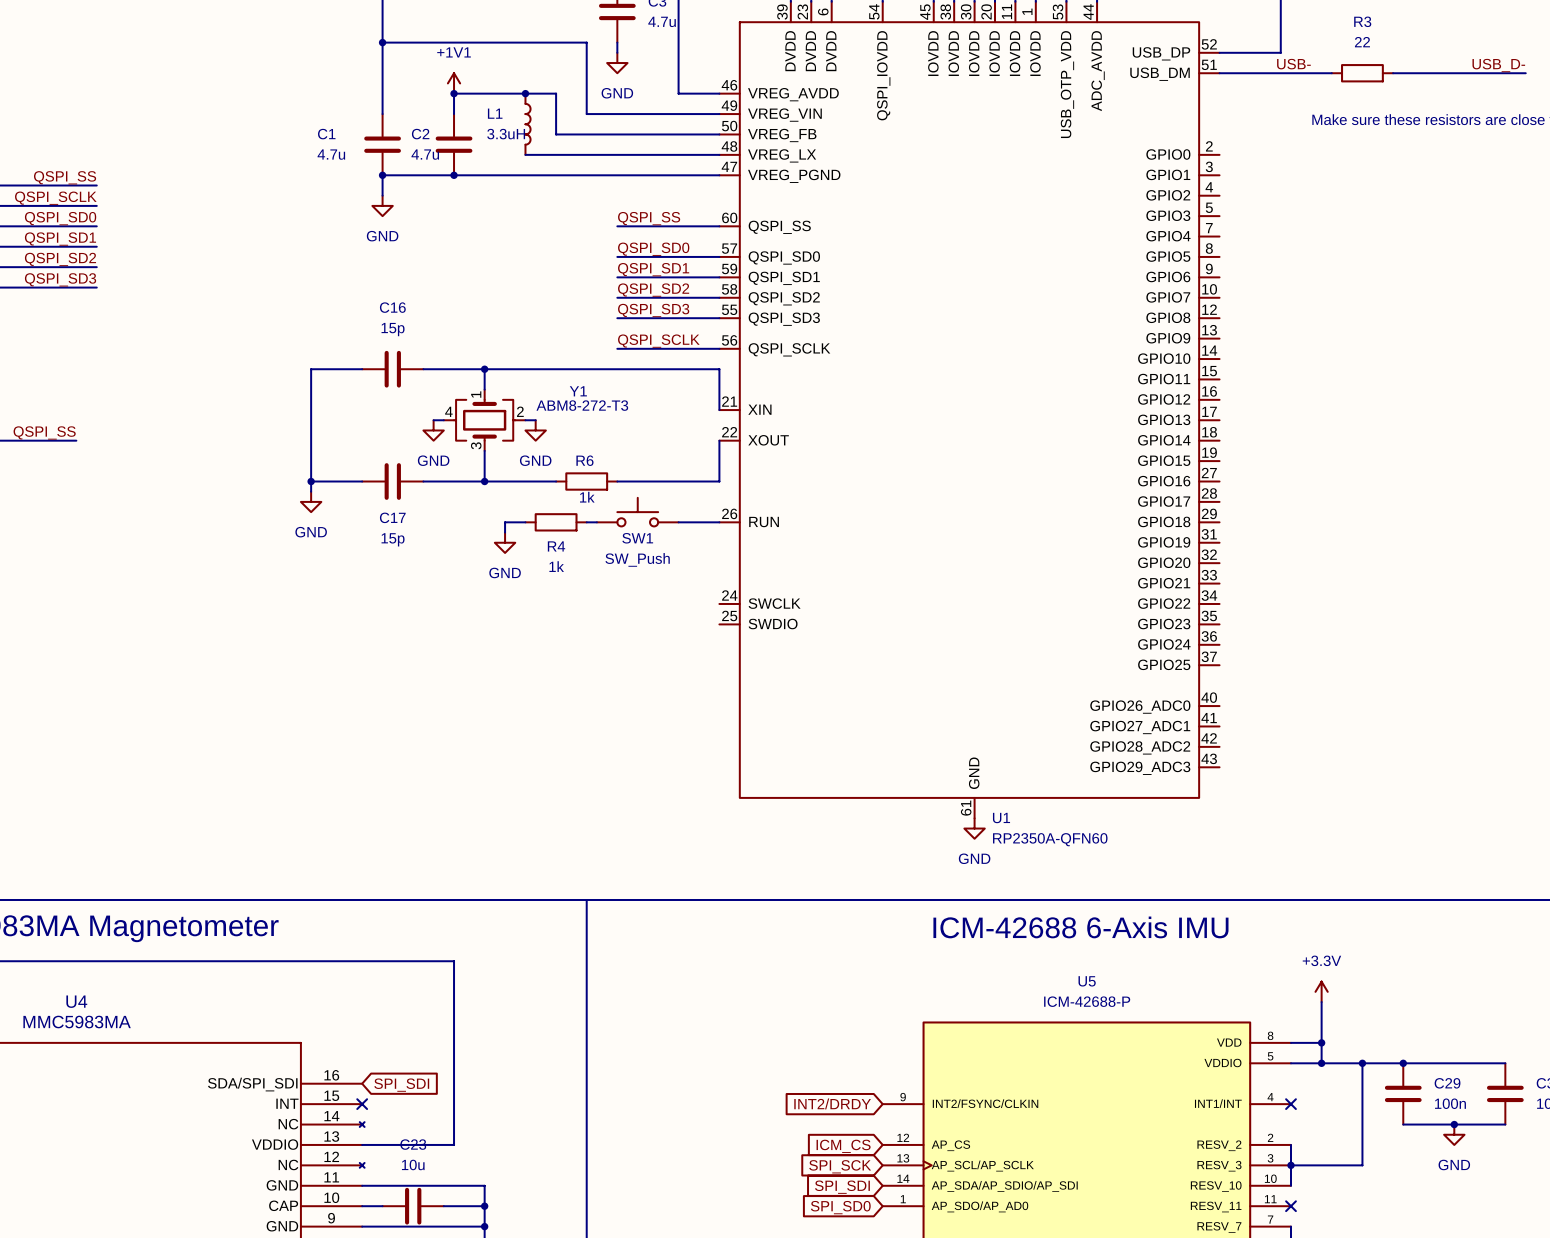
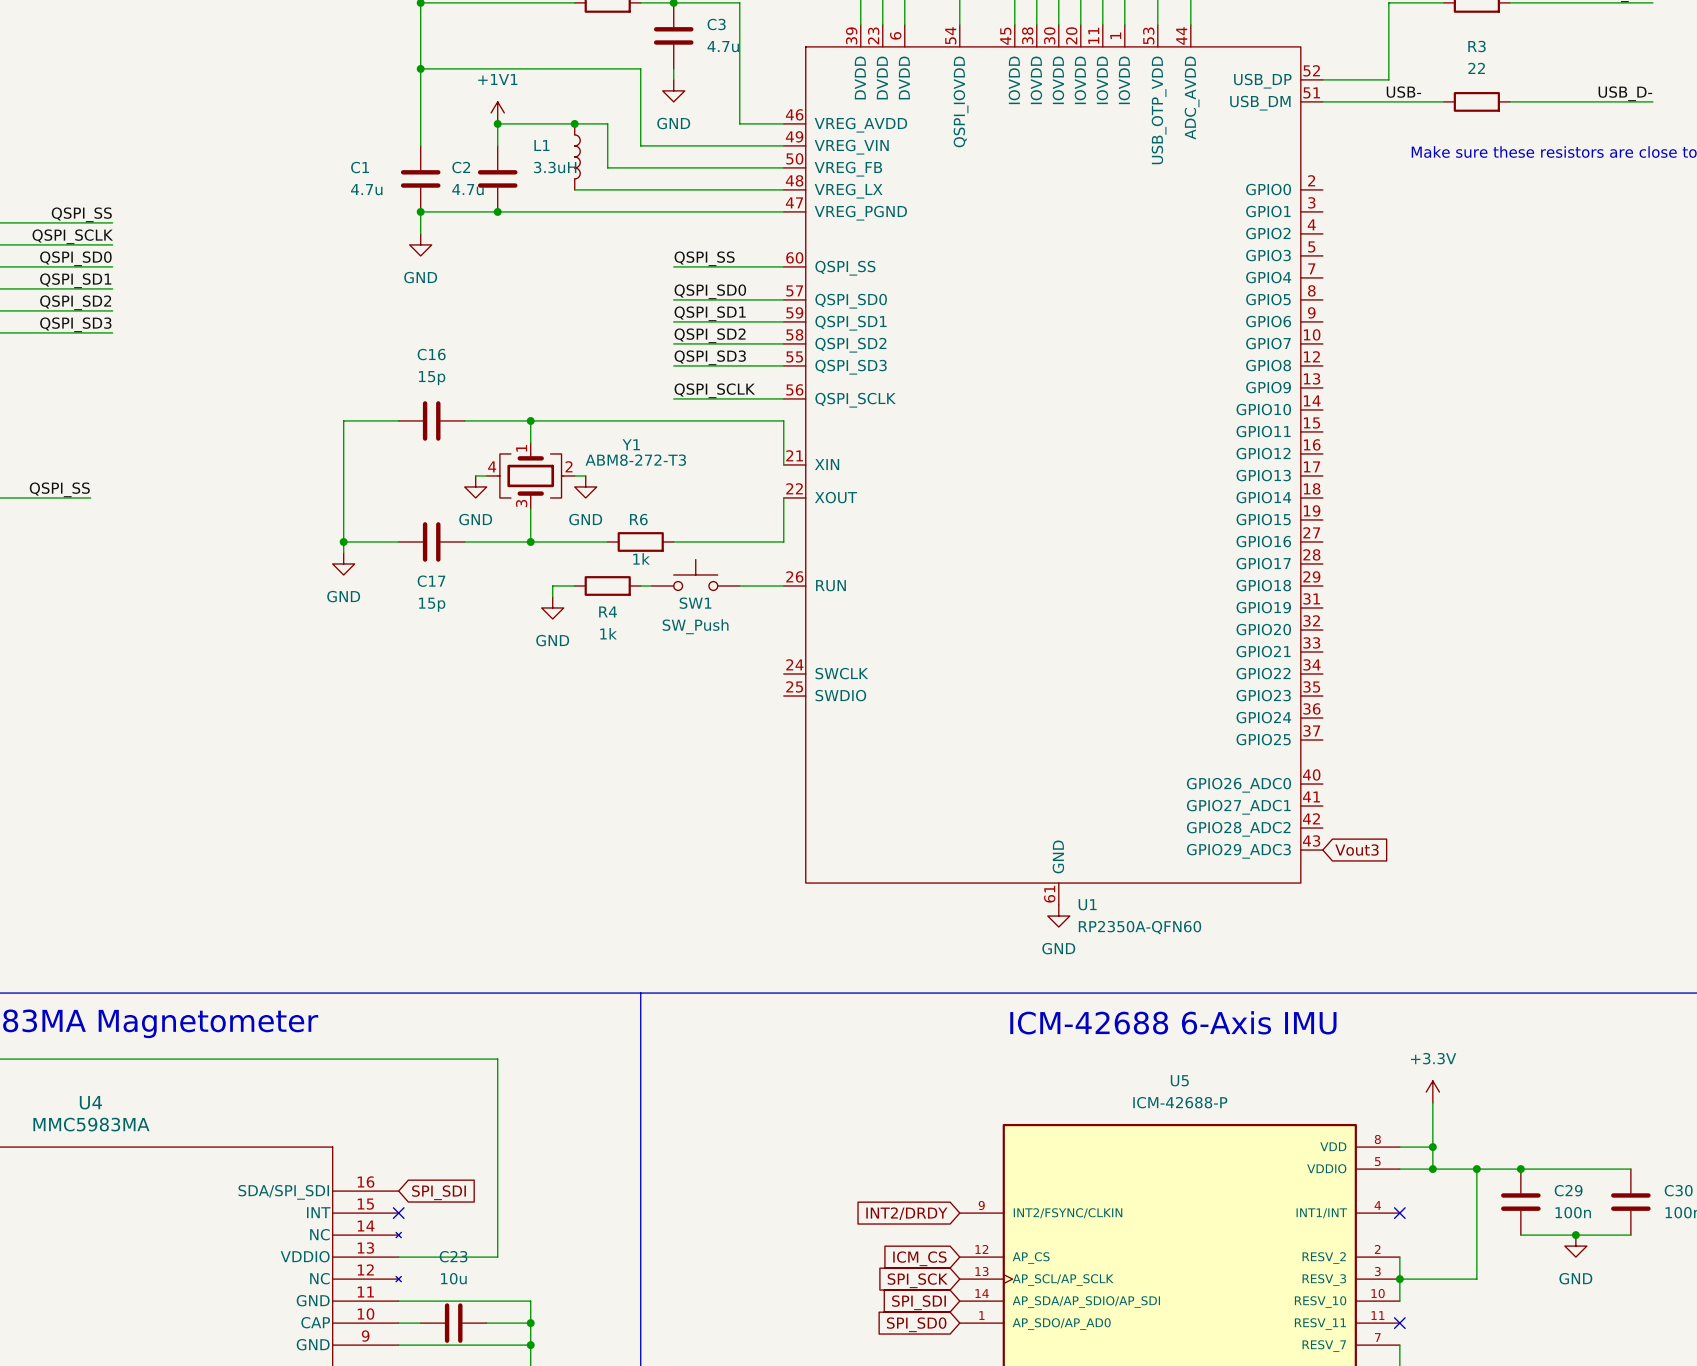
global label: none -> Vout3 (1356, 850)

